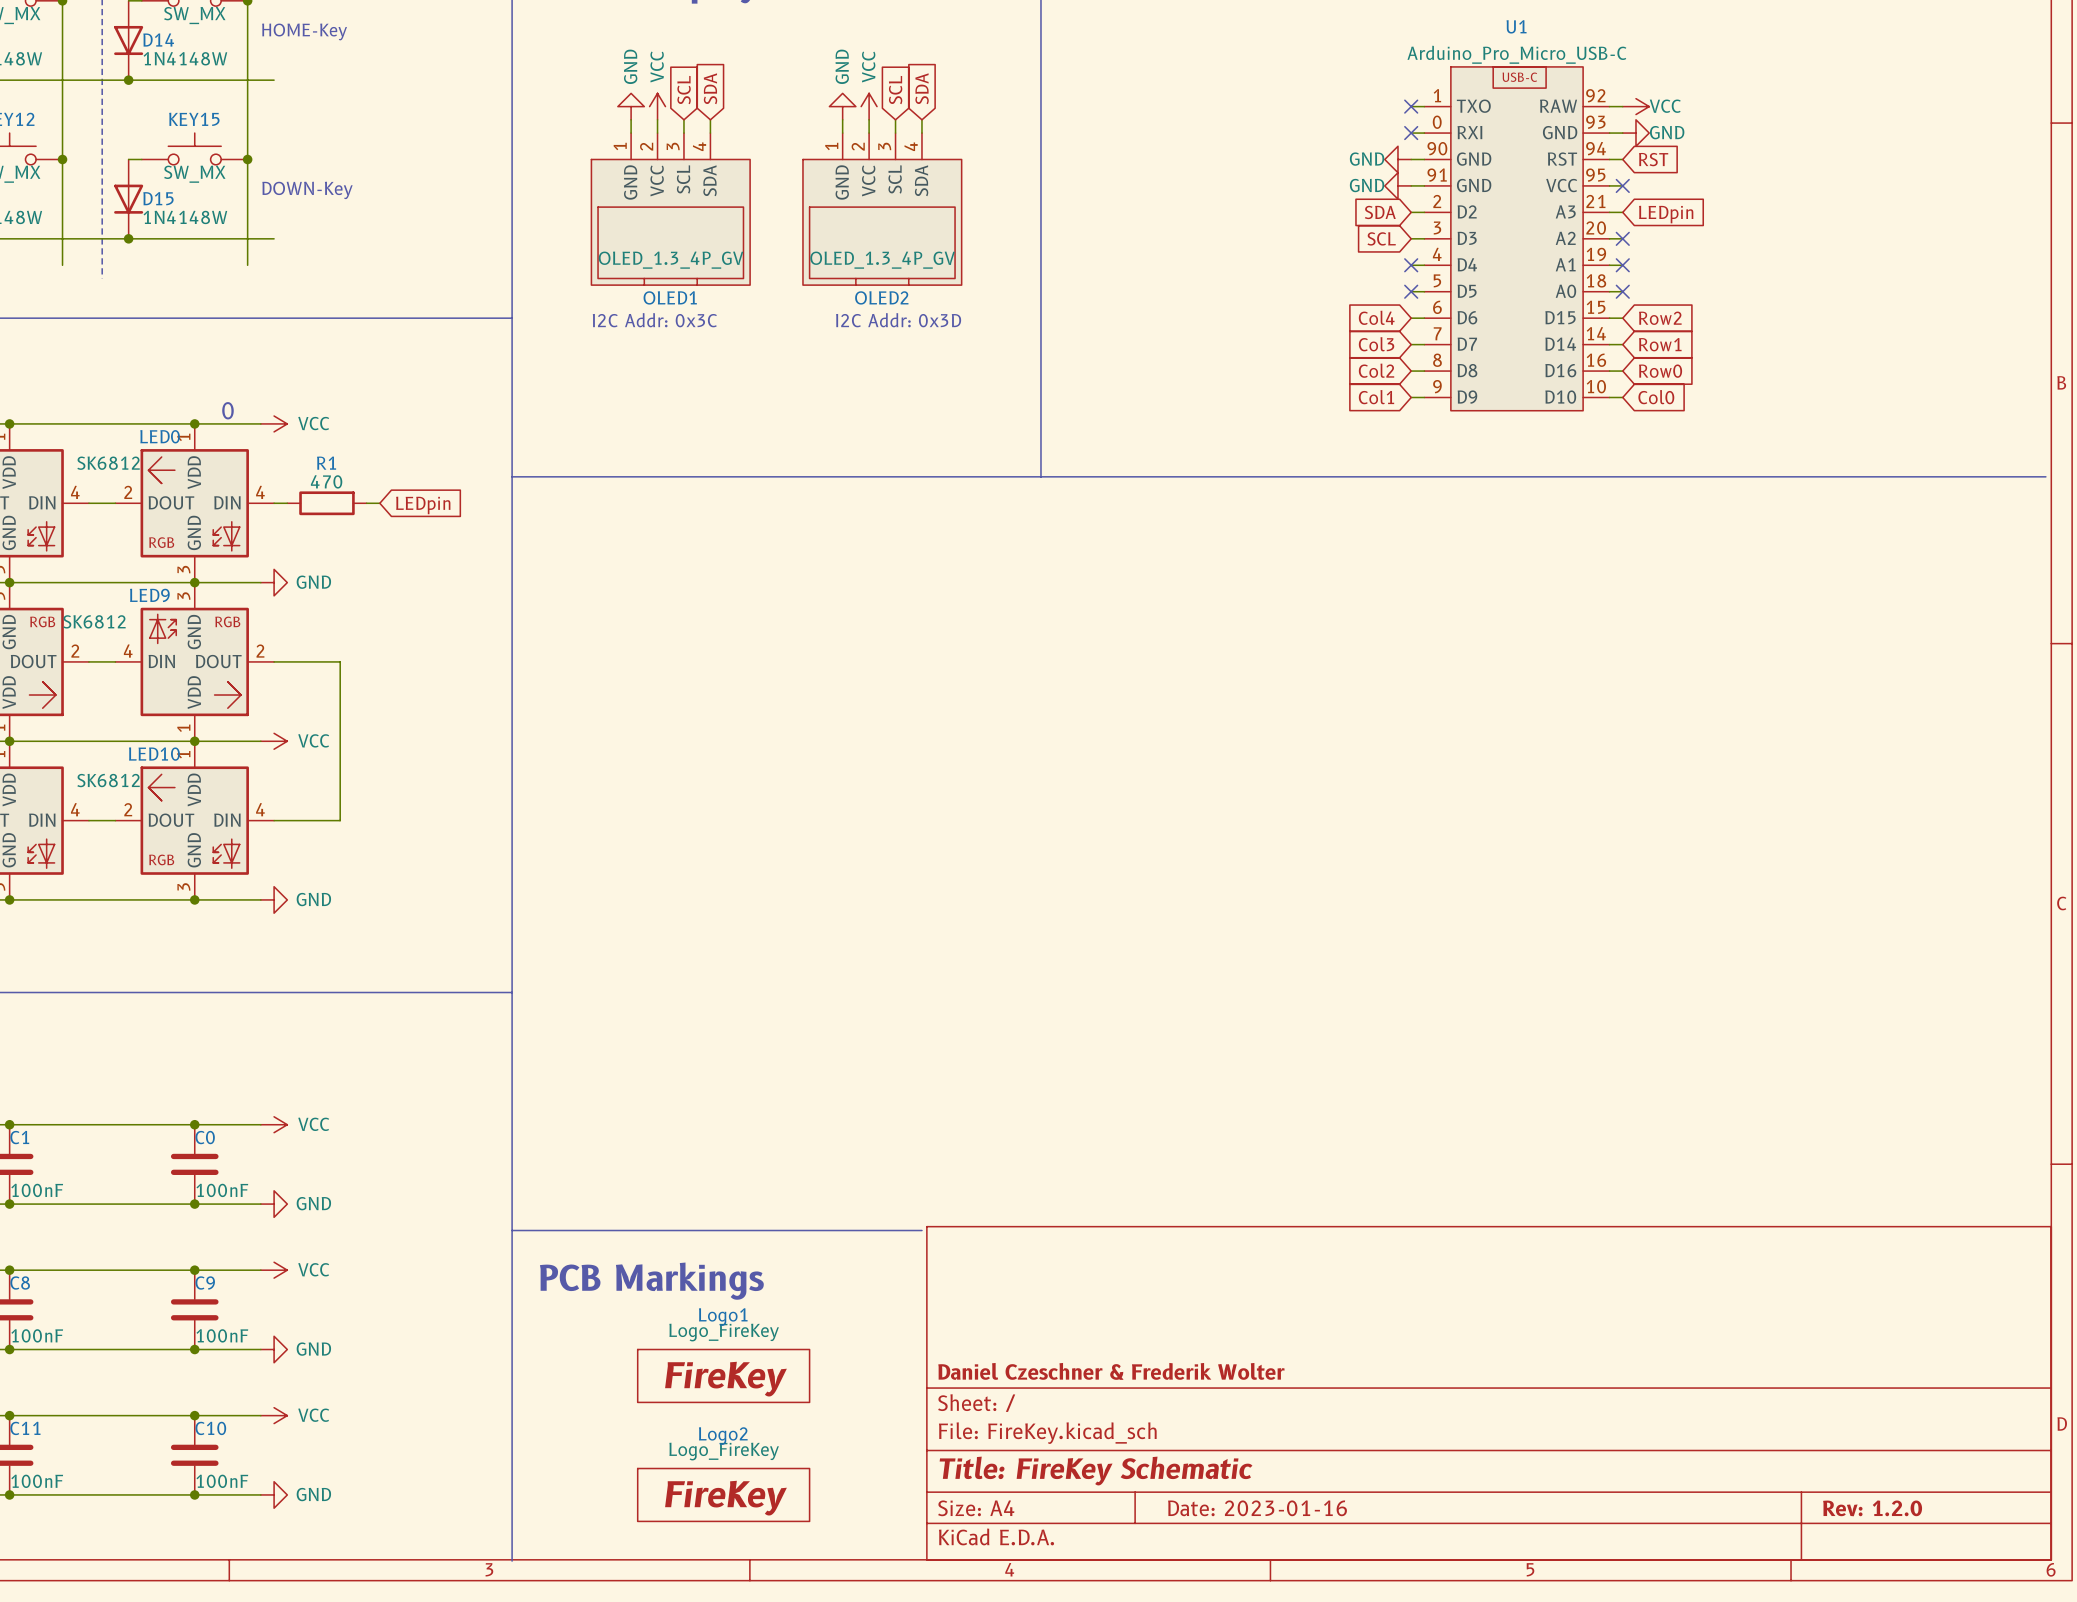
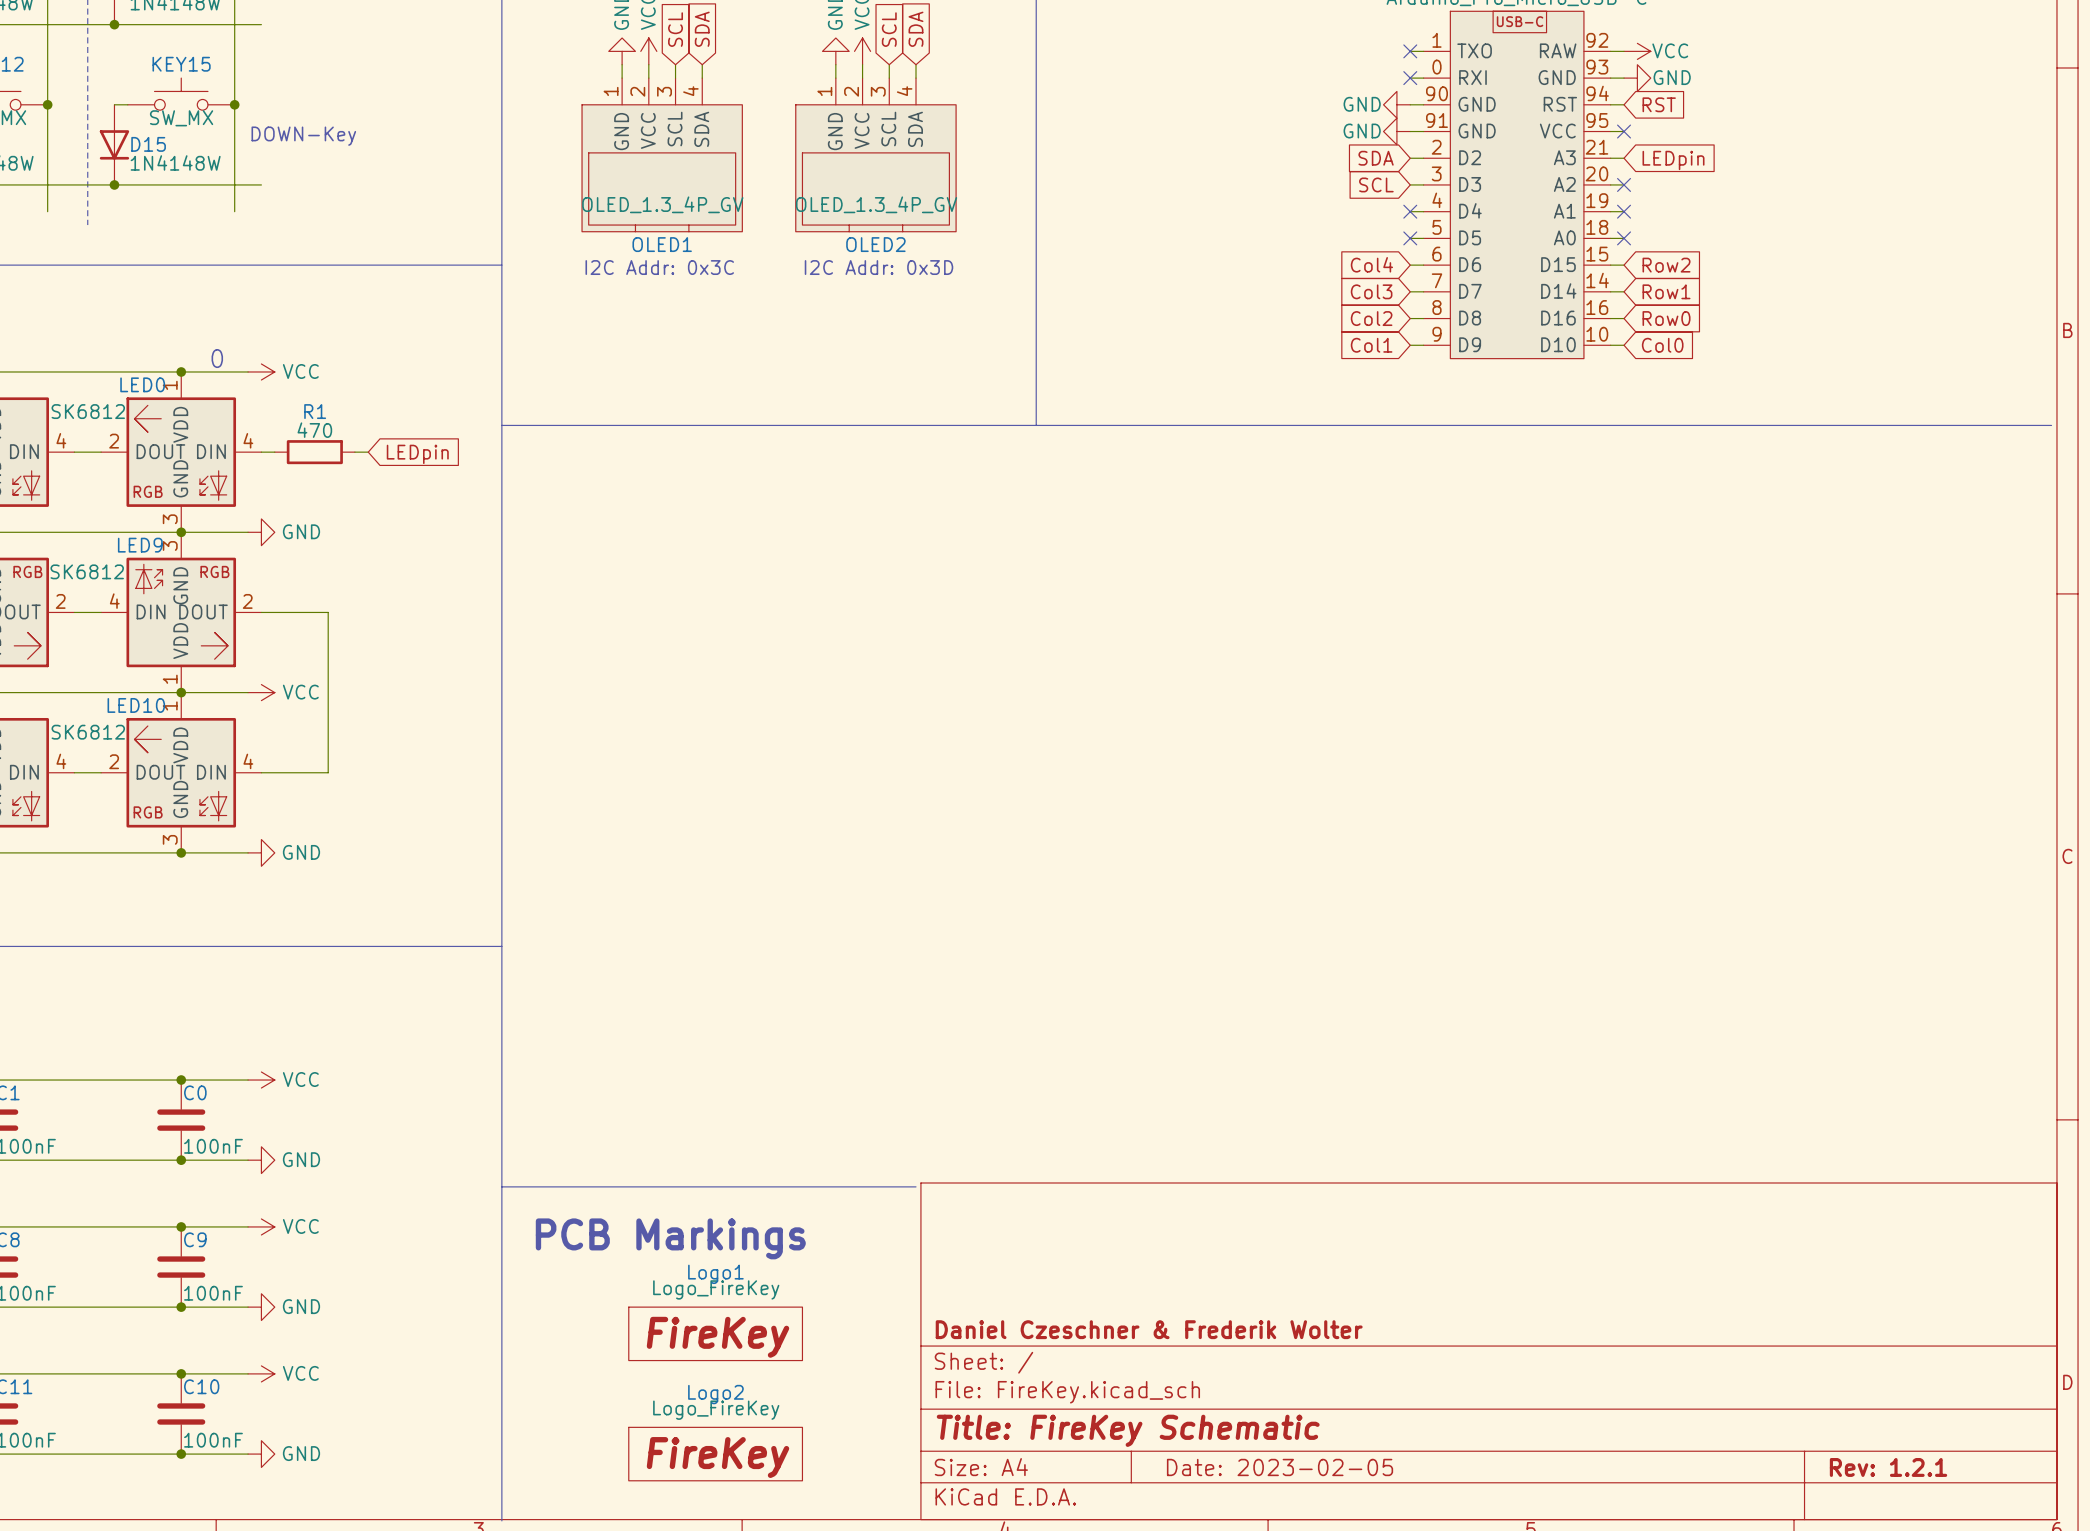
title block: Date: 2023-01-16 (1257, 1508) -> Date: 2023-02-05 (1280, 1467)
title block: Rev: 1.2.0 (1872, 1508) -> Rev: 1.2.1 (1888, 1467)

